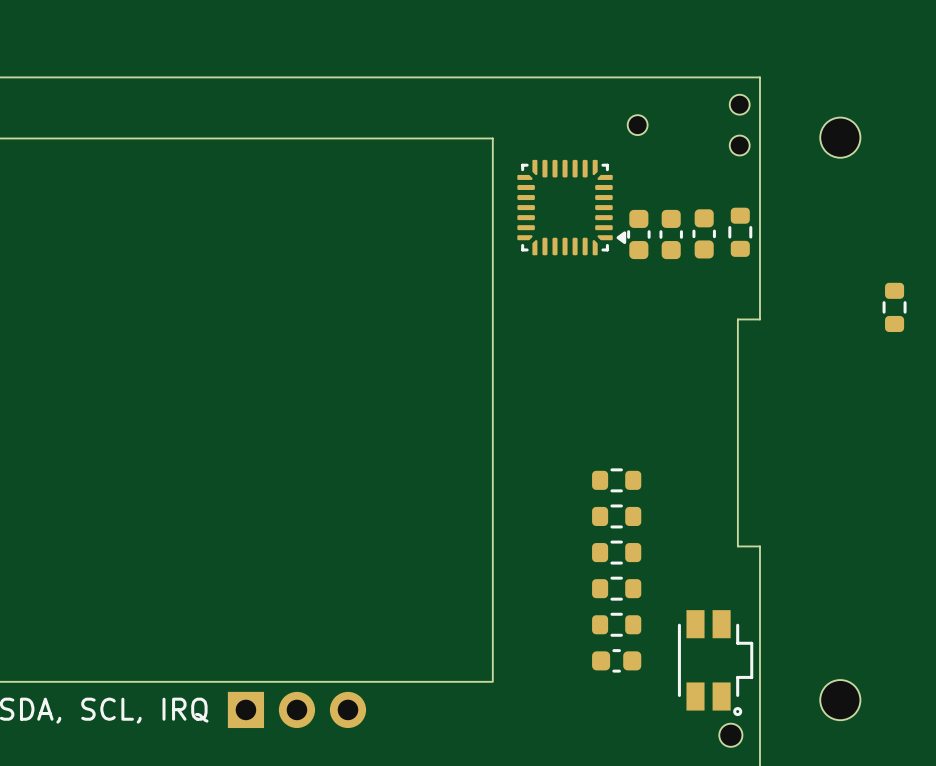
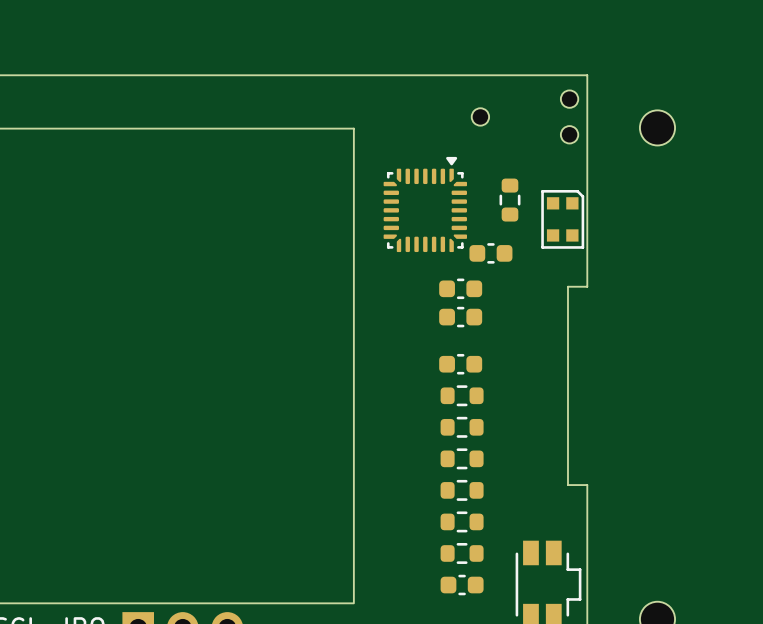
part rotation: 0° (571, 207) -> 90° counterclockwise (425, 204)
part footprint: [728, 207, 753, 257] -> [541, 190, 585, 249]
part footprint: [659, 209, 683, 260] -> [499, 178, 521, 222]
part: (704, 233) -> none
part: (638, 234) -> none
part: none -> (490, 253)
part rotation: 0° (894, 307) -> 90° clockwise (462, 395)
part position: (894, 307) -> (462, 395)
part: none -> (460, 288)
part: none -> (460, 317)
part: none -> (460, 364)

